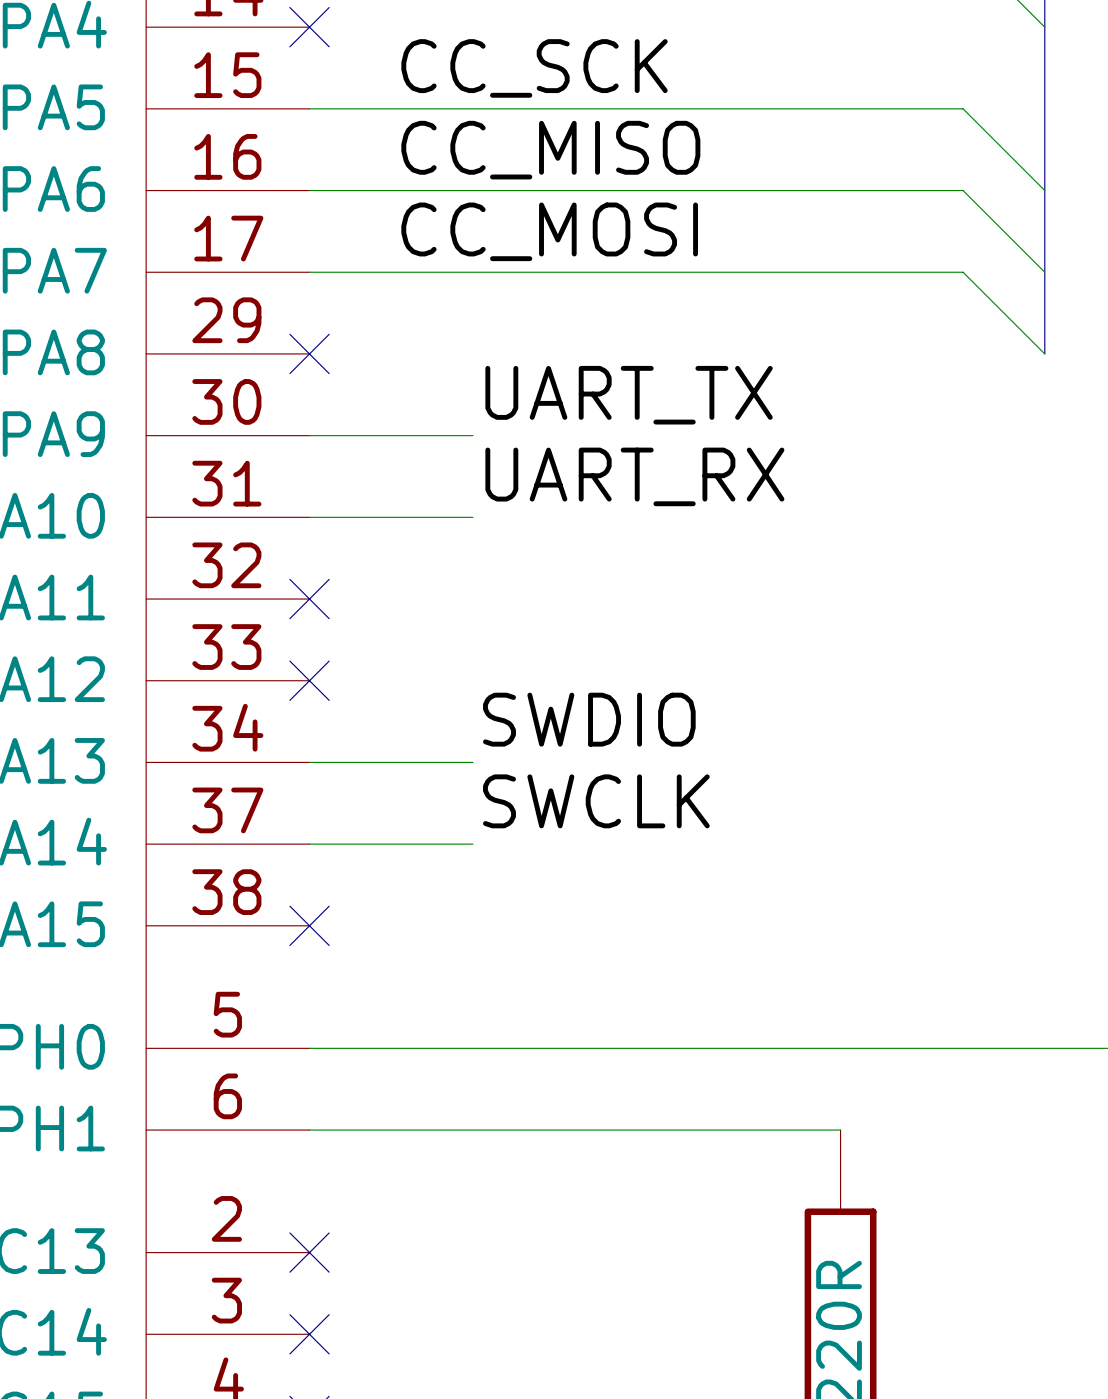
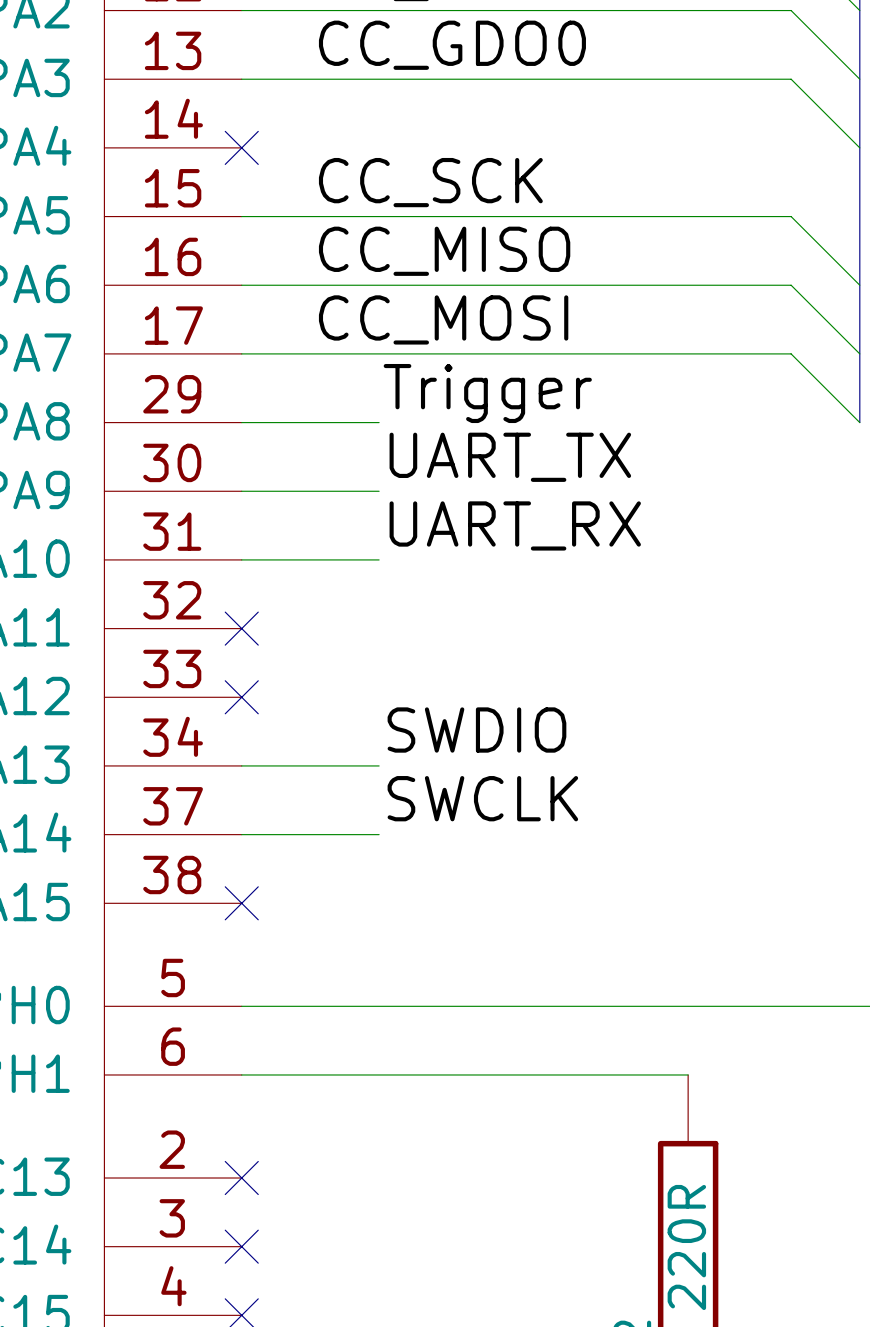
label: none -> Trigger (487, 393)
wire: none -> (241, 422) (379, 422)
no-connect mark: (309, 353) -> none

